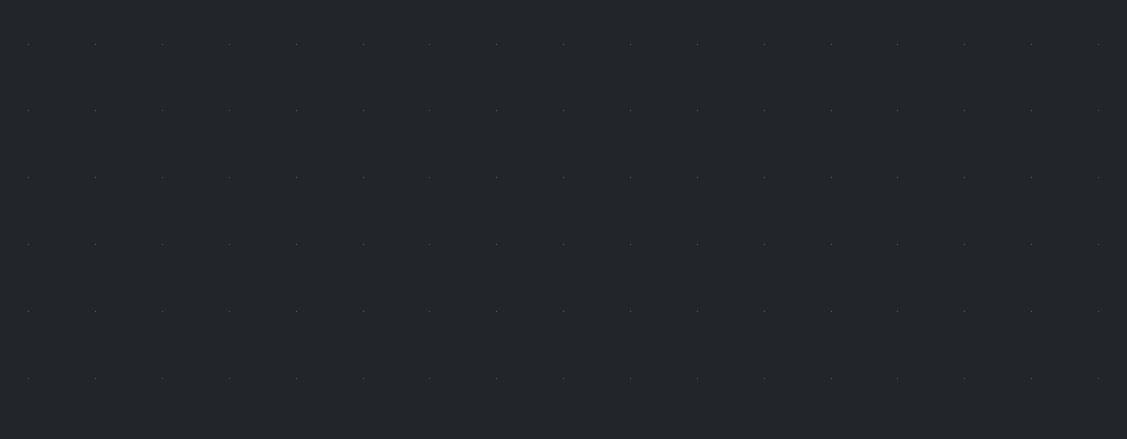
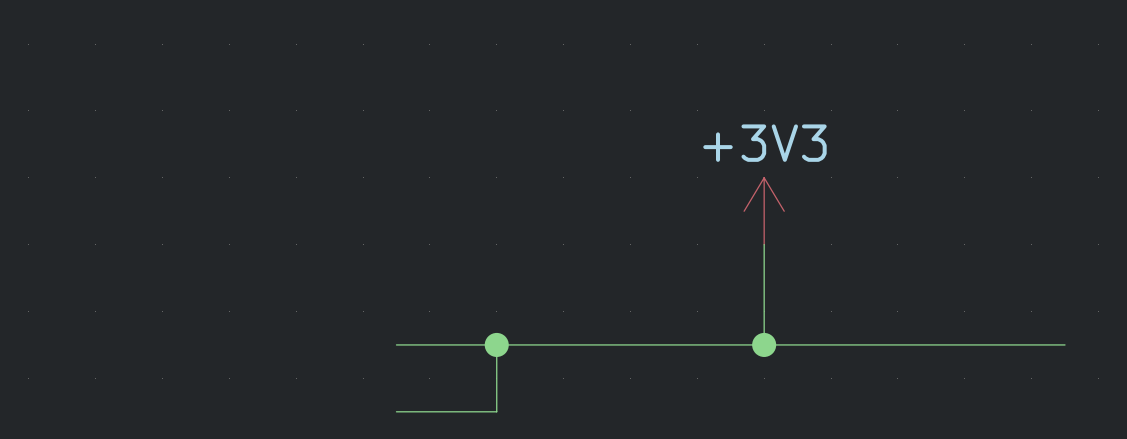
power symbol: none -> +3V3 (764, 211)
wire: none -> (764, 244) (764, 344)
wire: none -> (396, 344) (1065, 344)
wire: none -> (496, 344) (496, 411) (396, 411)
junction: none -> (496, 344)
junction: none -> (764, 344)

